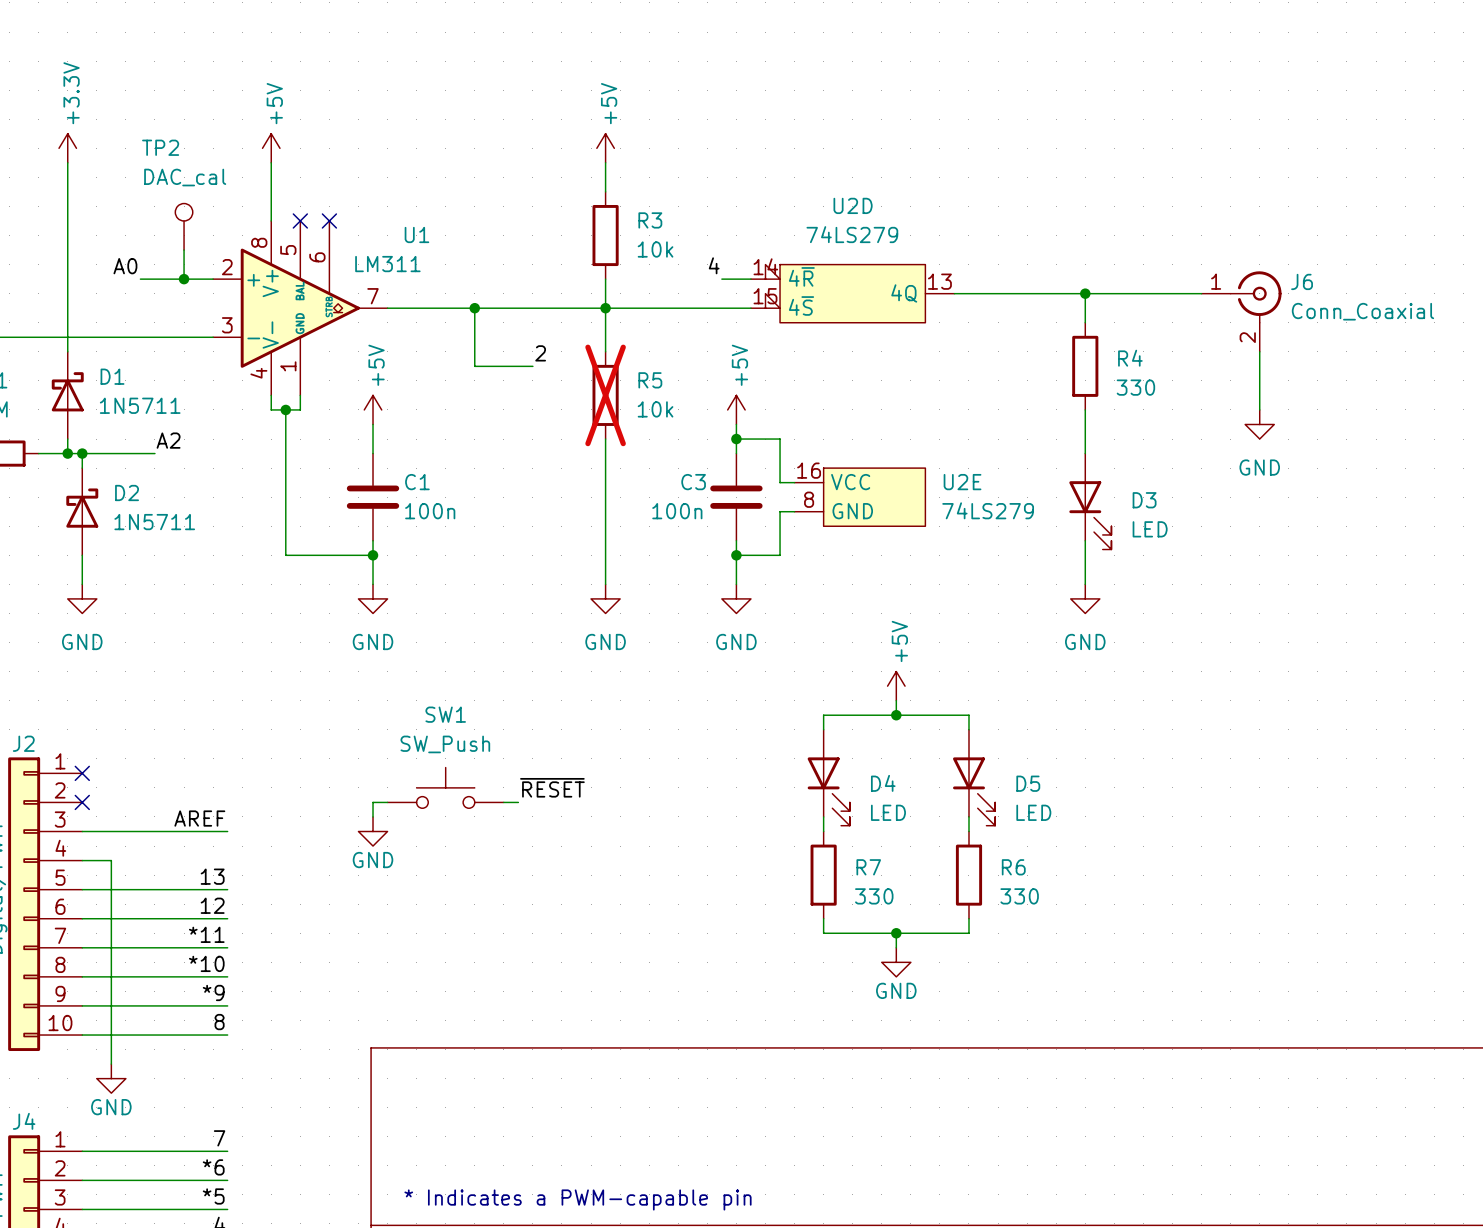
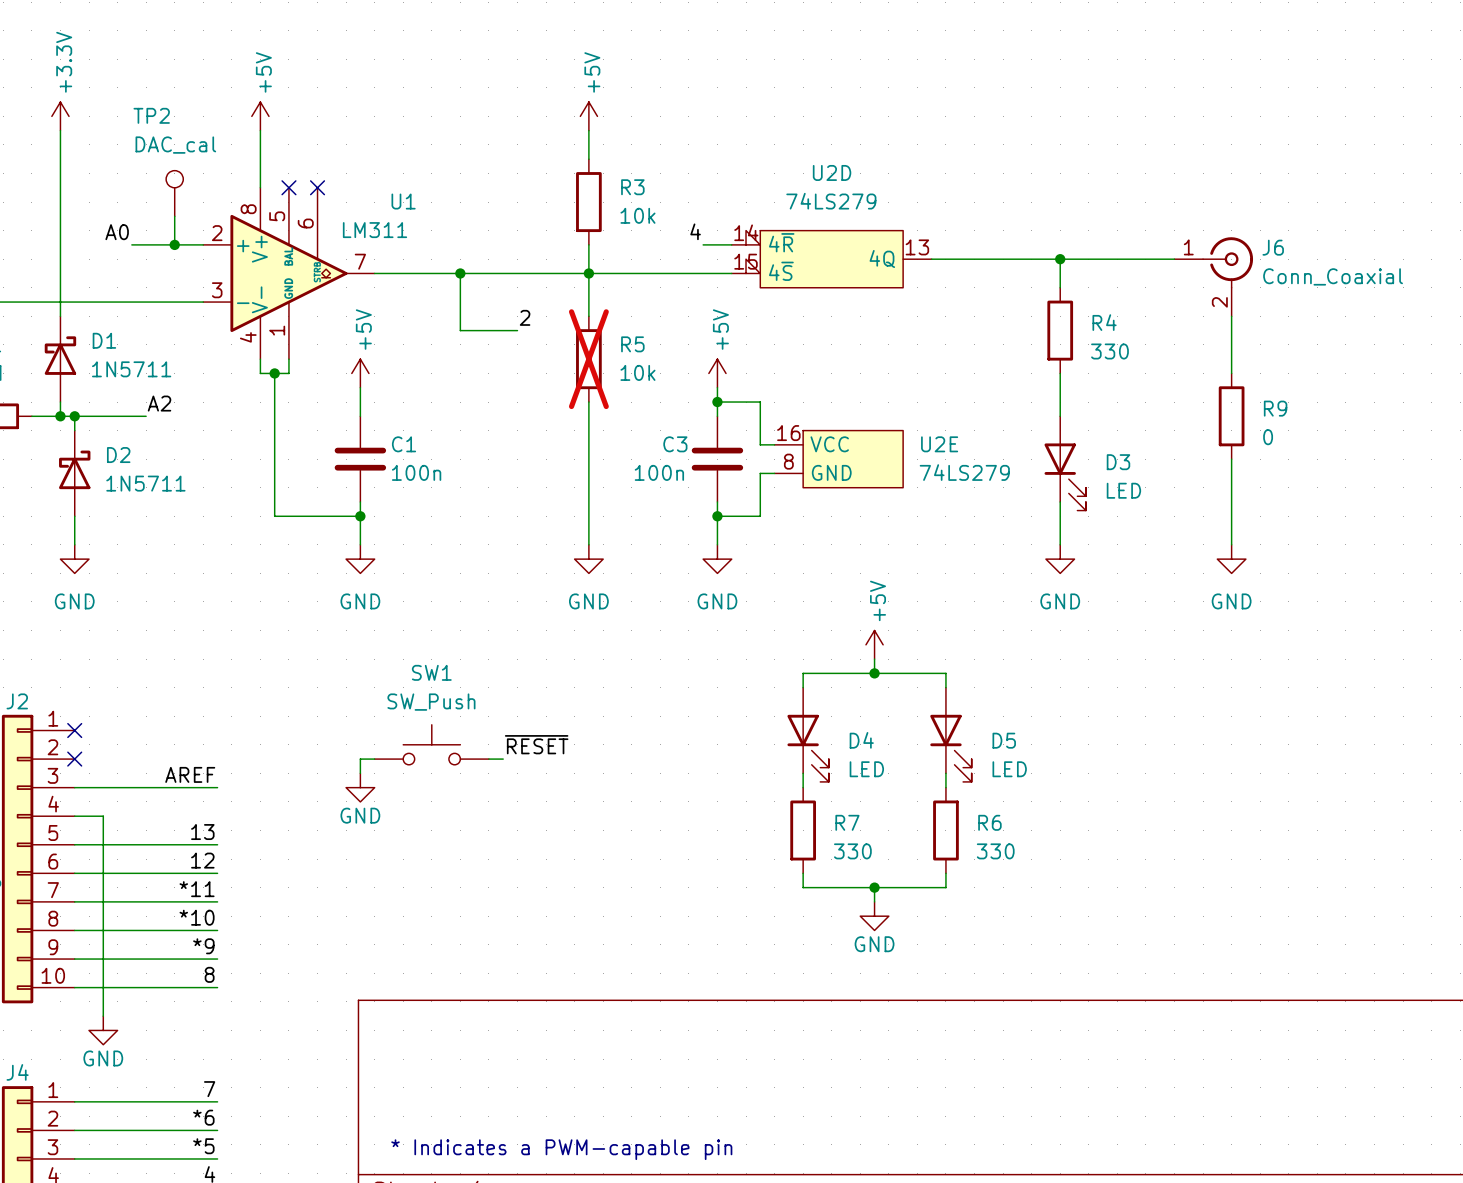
power symbol position: GND (1259, 424) -> GND (1231, 559)
R9: none -> 0 (1231, 416)
wire: none -> (1231, 459) (1231, 544)

